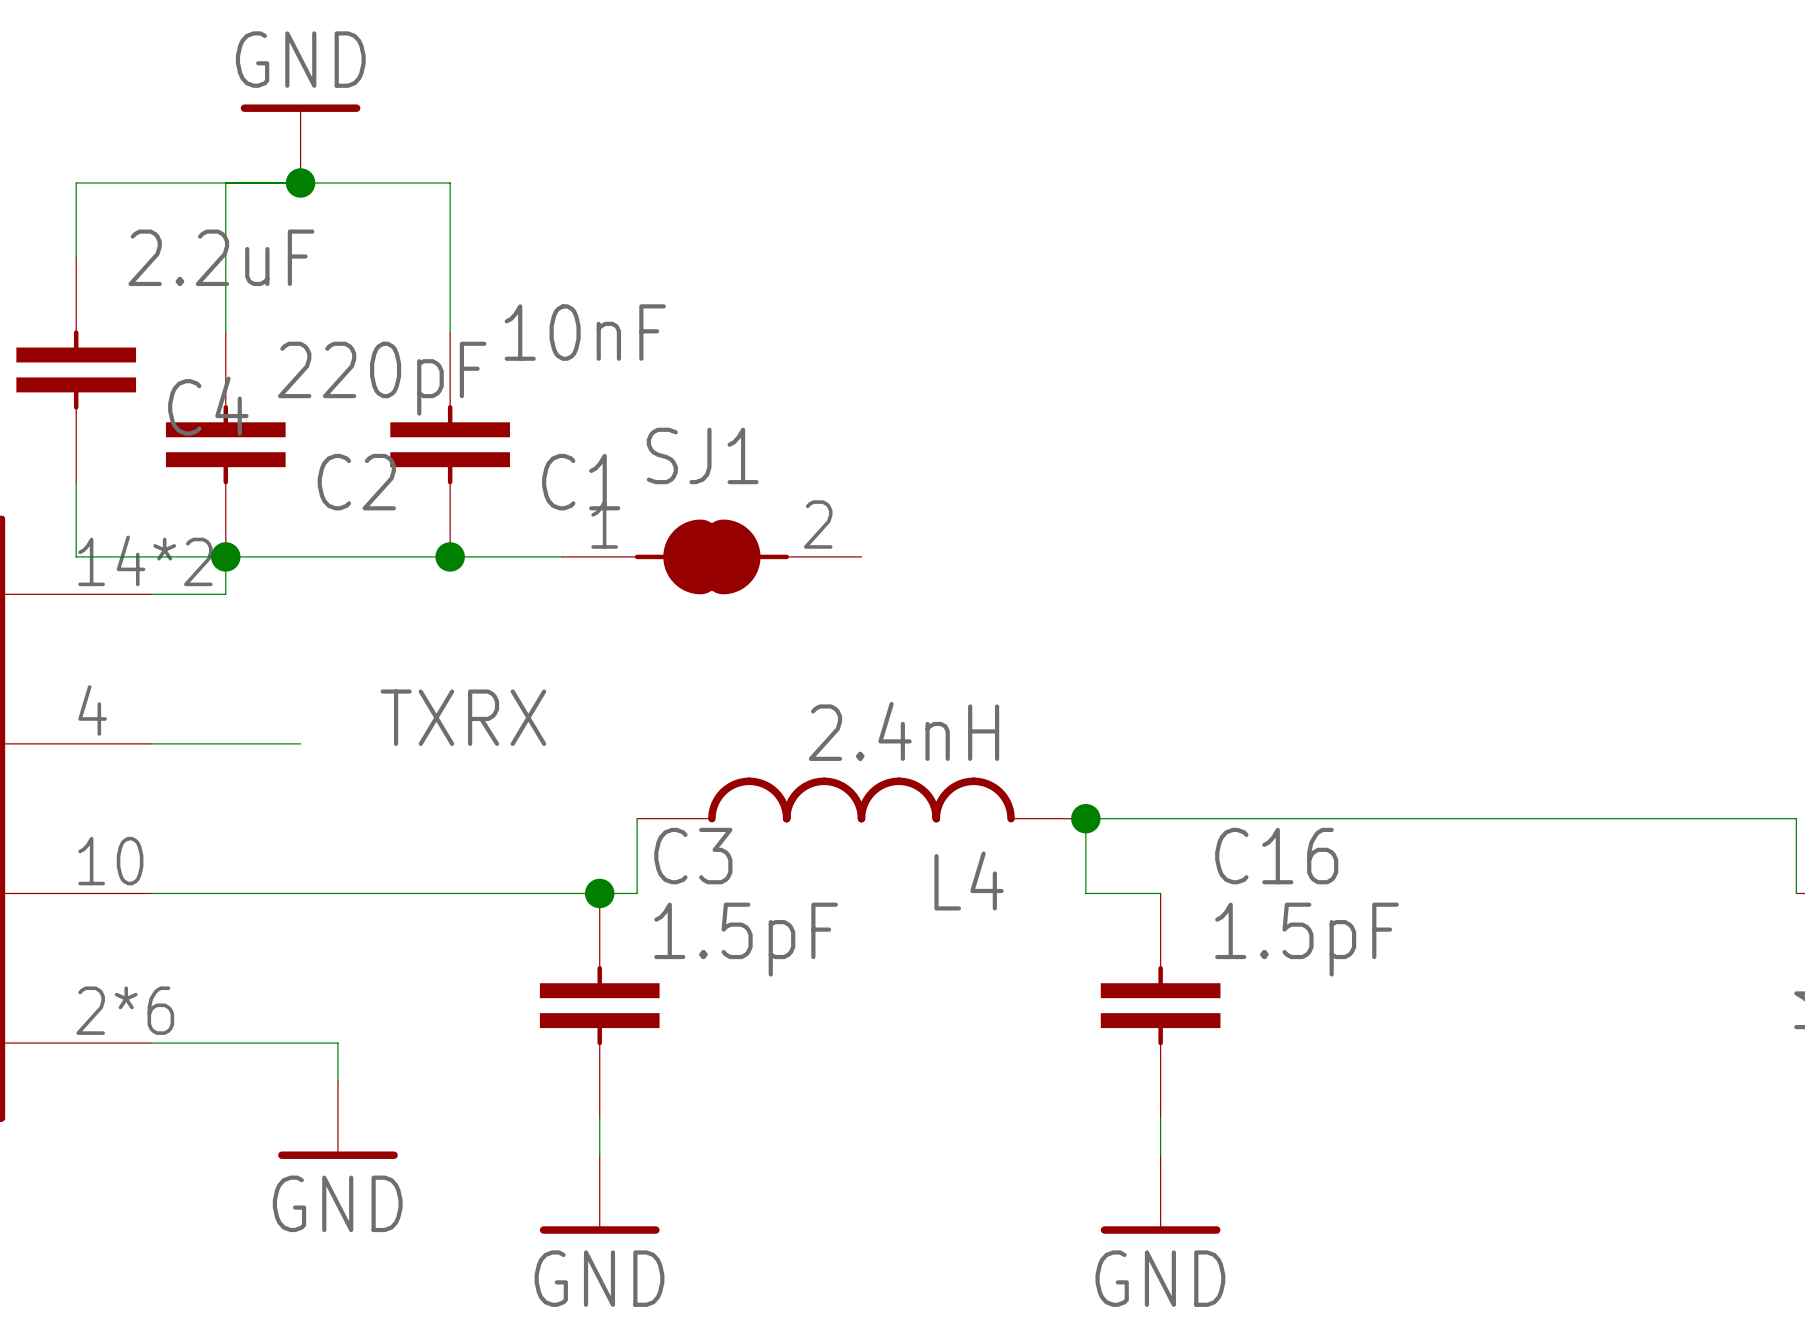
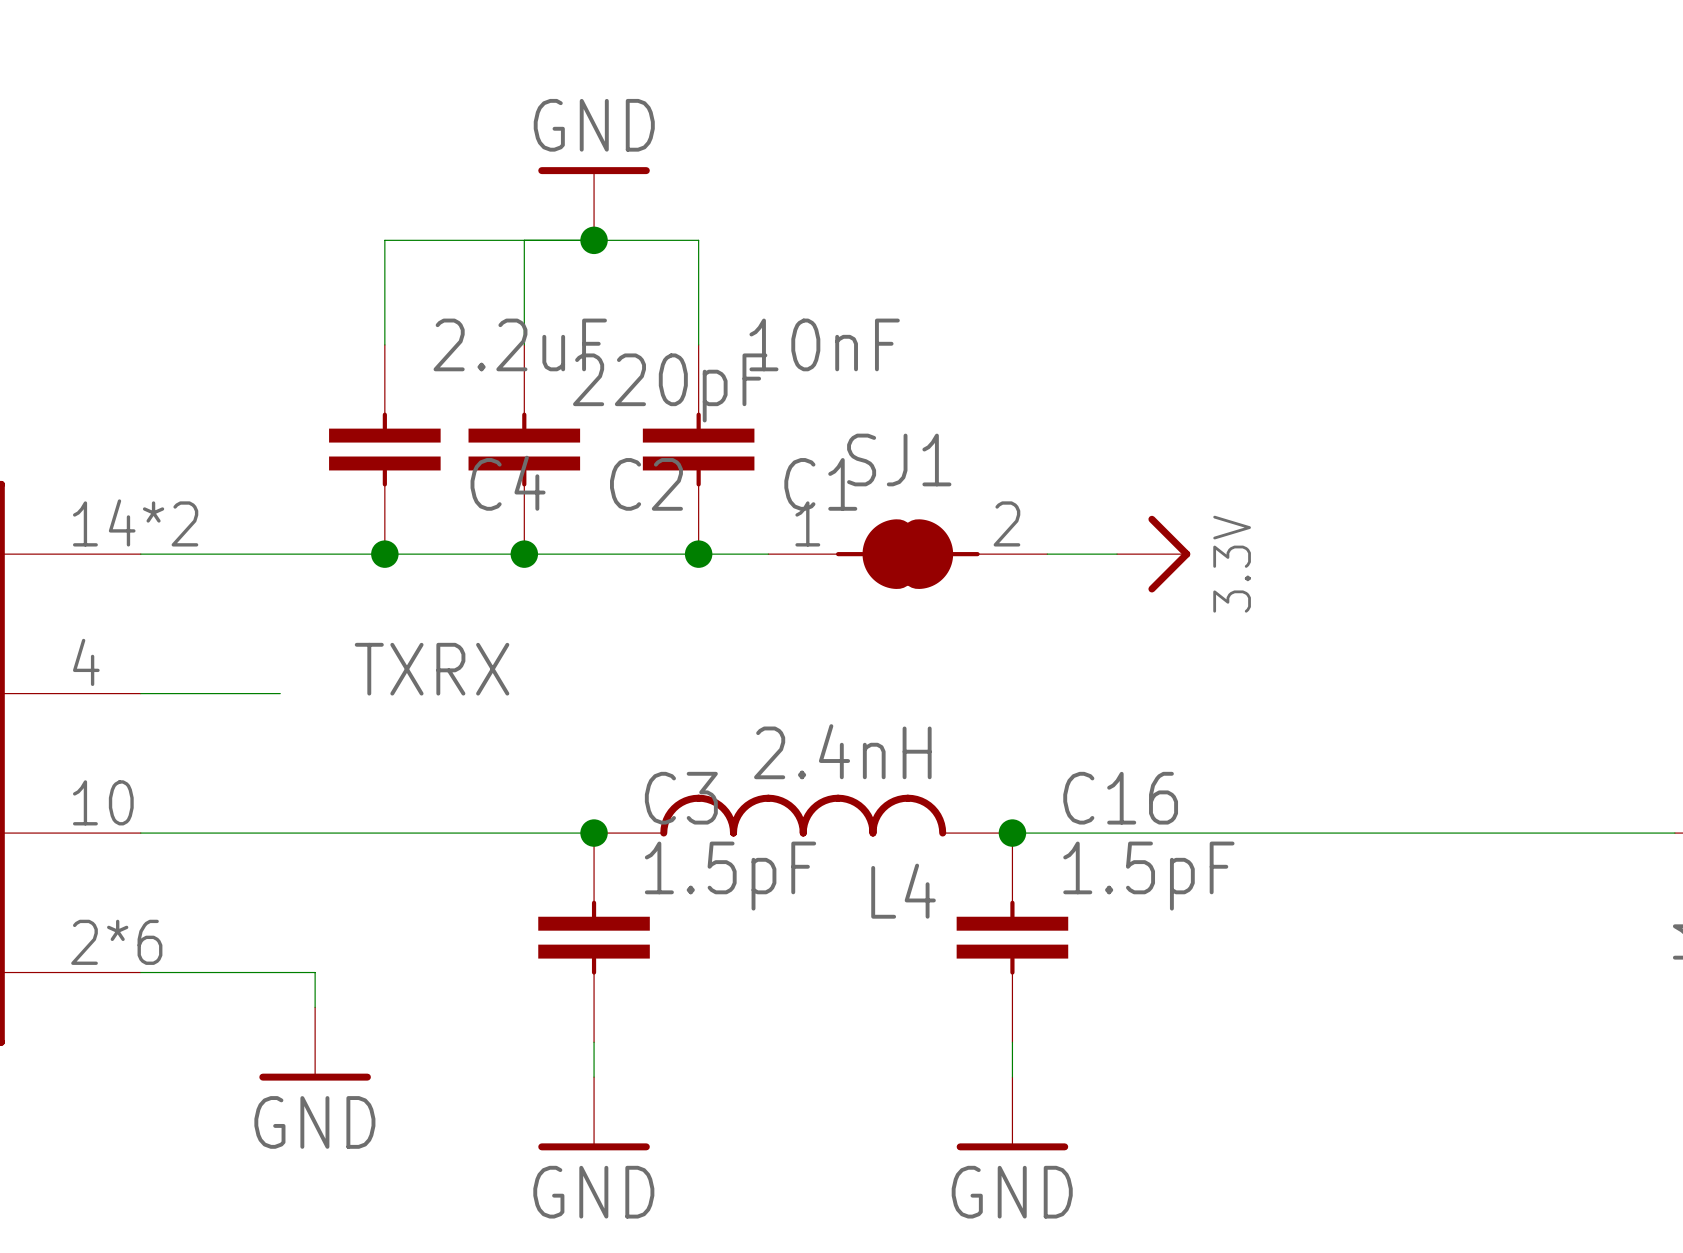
power symbol position: GND (300, 143) -> GND (594, 203)
wire: (225, 182) (225, 332) -> none
junction: (300, 182) -> none
wire: (76, 257) (76, 182) (450, 182) (450, 332) -> none
wire: none -> (524, 240) (524, 344)
junction: none -> (594, 240)
C4 position: (76, 369) -> (384, 449)
wire: none -> (384, 344) (384, 240) (698, 240) (698, 344)
C2 position: (225, 444) -> (524, 449)
C1 position: (450, 444) -> (698, 449)
wire: (76, 482) (76, 556) (562, 556) -> none
wire: (225, 556) (225, 594) -> (768, 554) (210, 554)
junction: (225, 556) -> none
junction position: (450, 556) -> (384, 554)
SJ1 position: (711, 556) -> (907, 554)
junction: none -> (524, 554)
junction: none -> (698, 554)
wire: none -> (1047, 554) (1117, 554)
power symbol: none -> 3.3V (1153, 554)
L4 position: (861, 799) -> (803, 815)
wire: (637, 818) (637, 893) -> none
junction position: (1085, 818) -> (1012, 833)
junction position: (599, 893) -> (594, 833)
wire: (1085, 893) (1085, 818) (1796, 818) (1796, 893) -> (1082, 833) (1674, 833)
C3 position: (599, 1005) -> (594, 937)
C16 position: (1160, 1005) -> (1012, 937)
wire: (599, 1117) (599, 1155) -> (594, 1042) (594, 1077)
wire: (1160, 1117) (1160, 1155) -> (1012, 1042) (1012, 1077)
power symbol position: GND (599, 1194) -> GND (594, 1113)
power symbol position: GND (1160, 1194) -> GND (1012, 1113)

